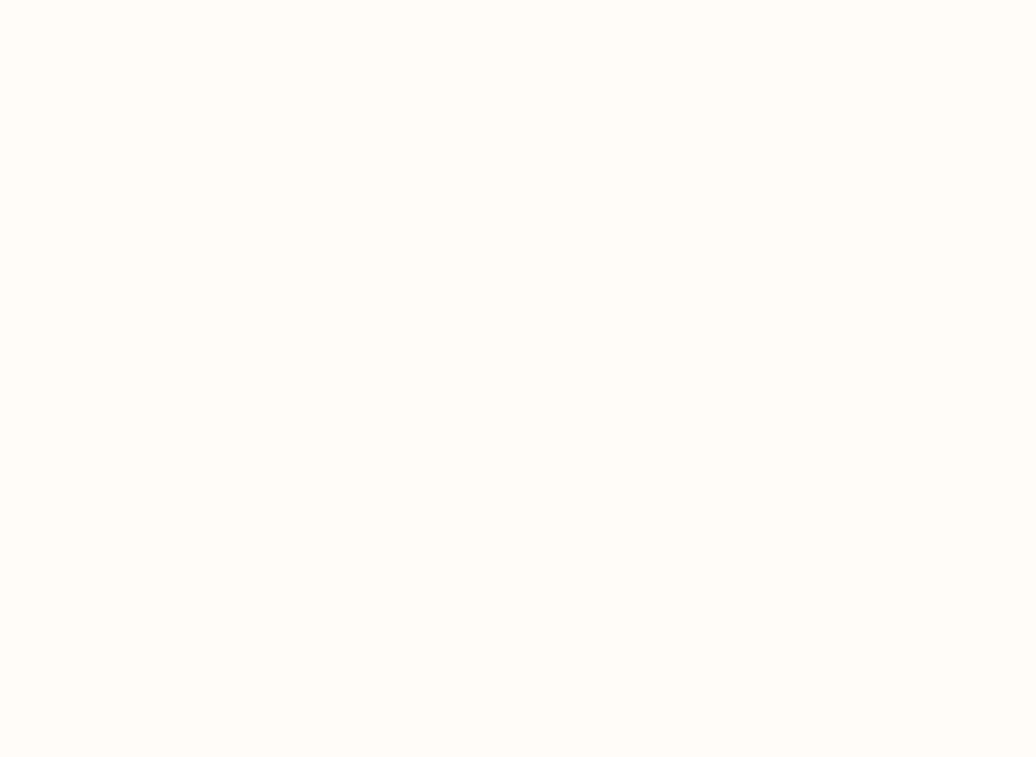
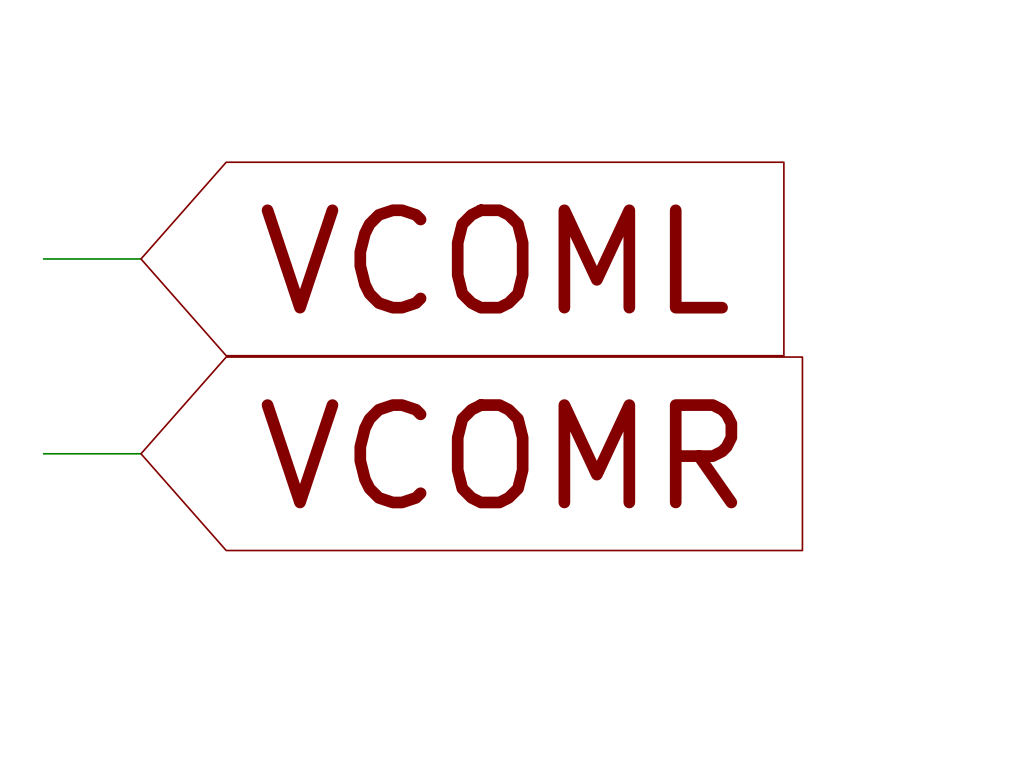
wire: none -> (43, 258) (140, 258)
global label: none -> VCOML (494, 258)
wire: none -> (43, 453) (140, 453)
global label: none -> VCOMR (499, 453)

